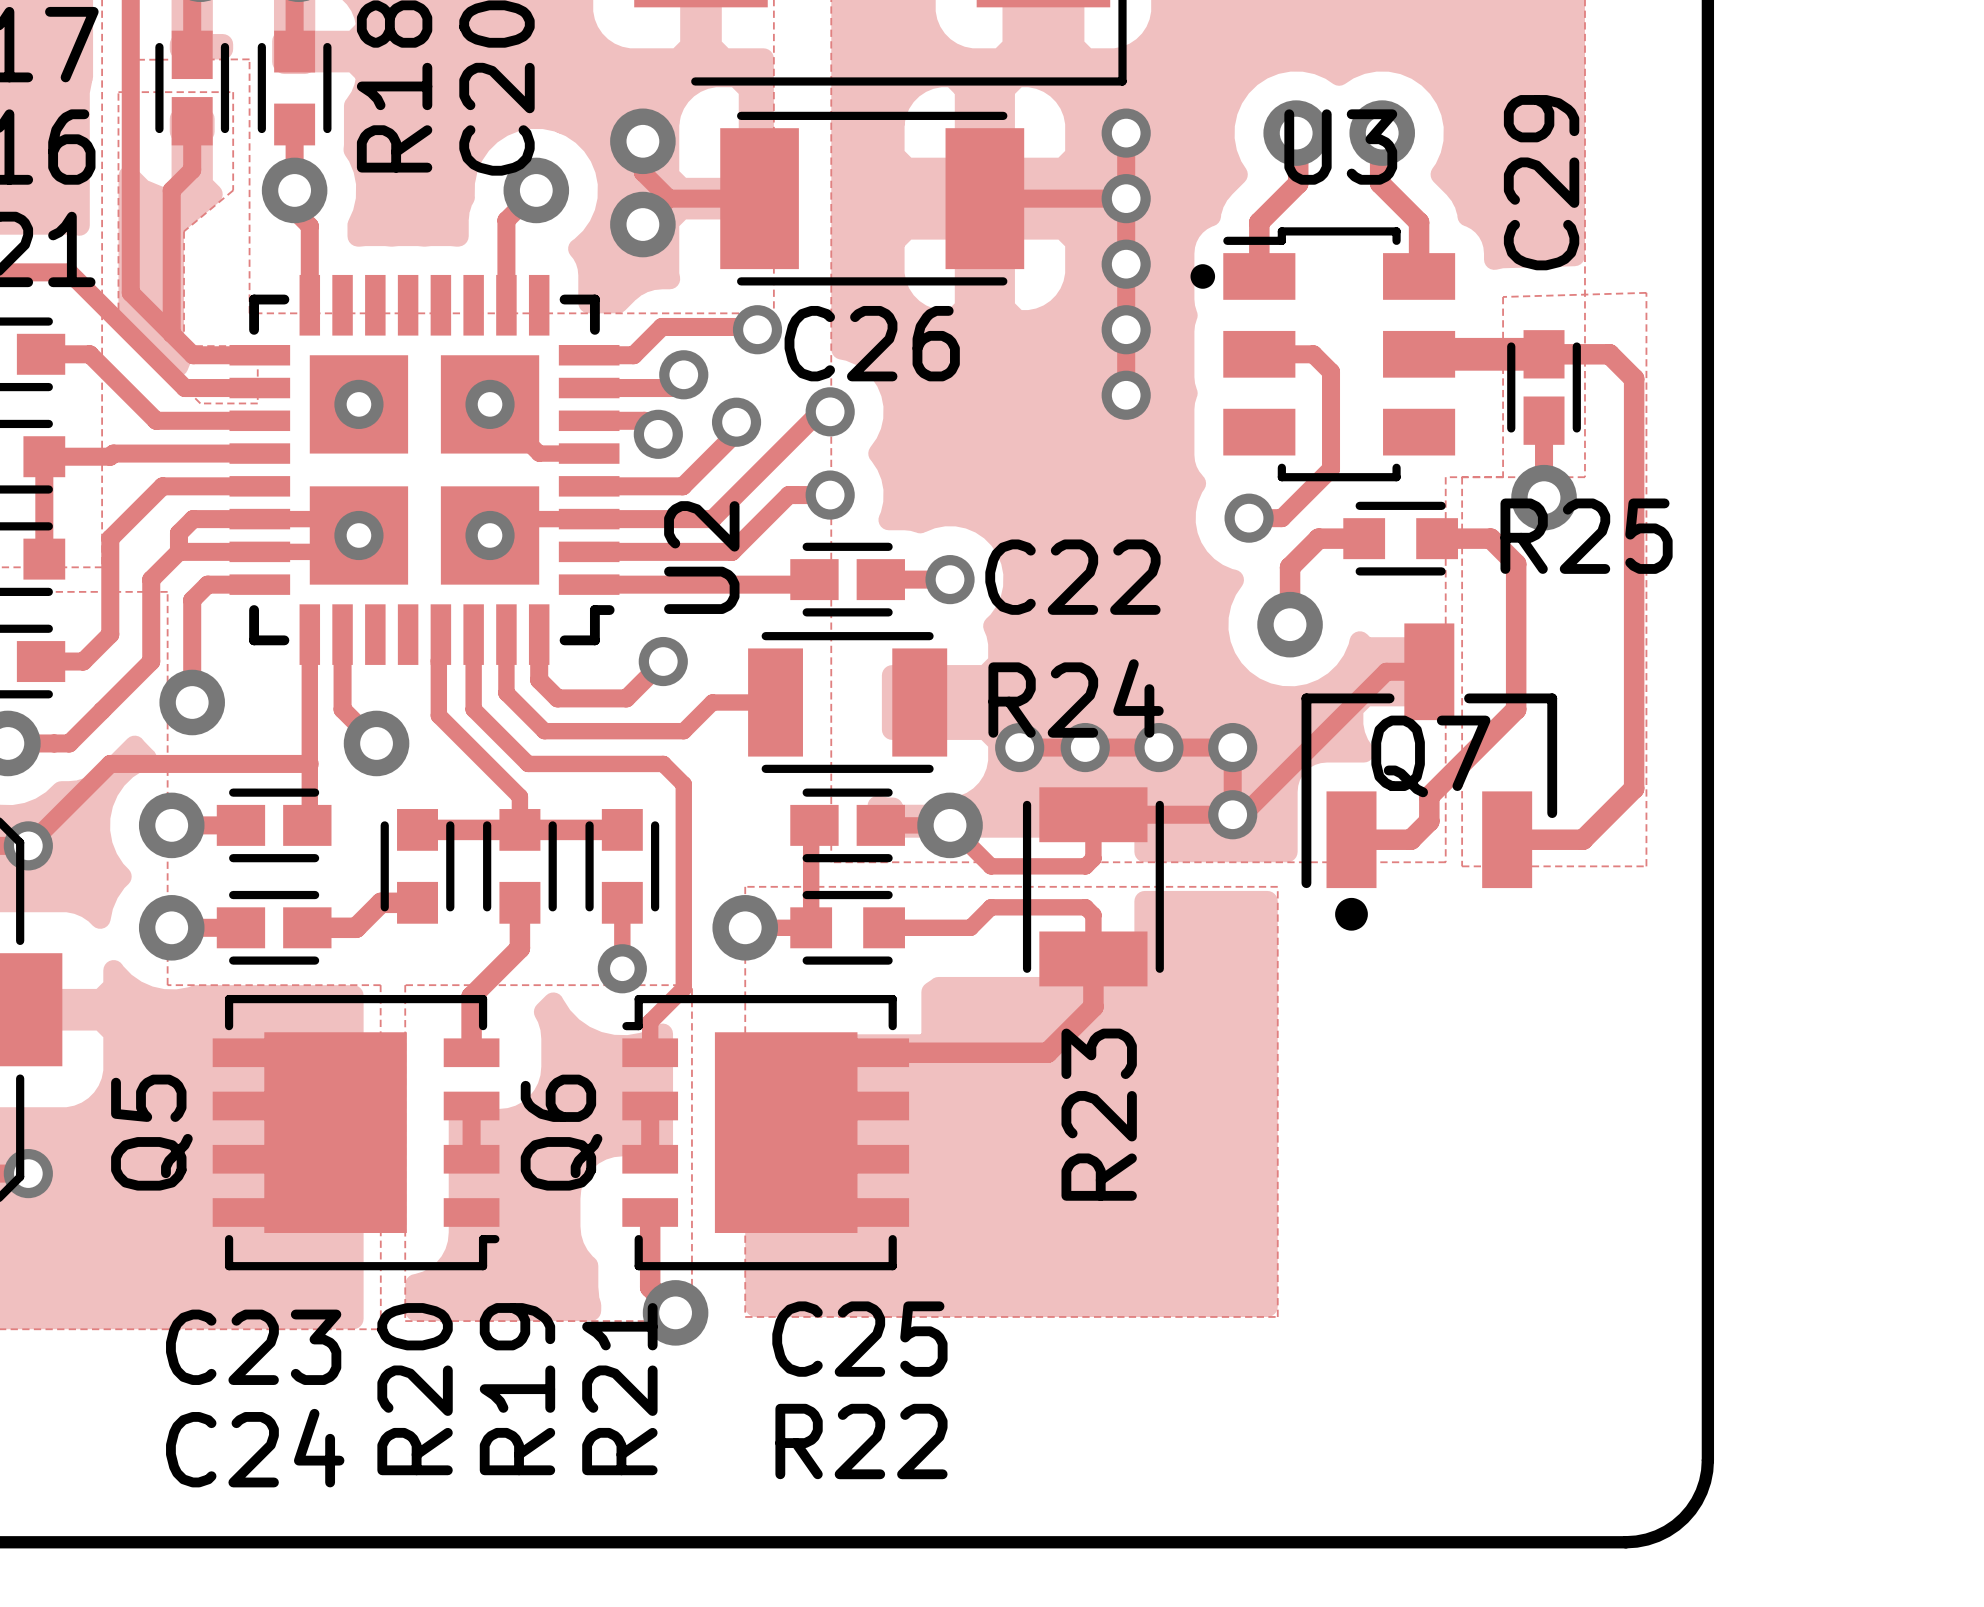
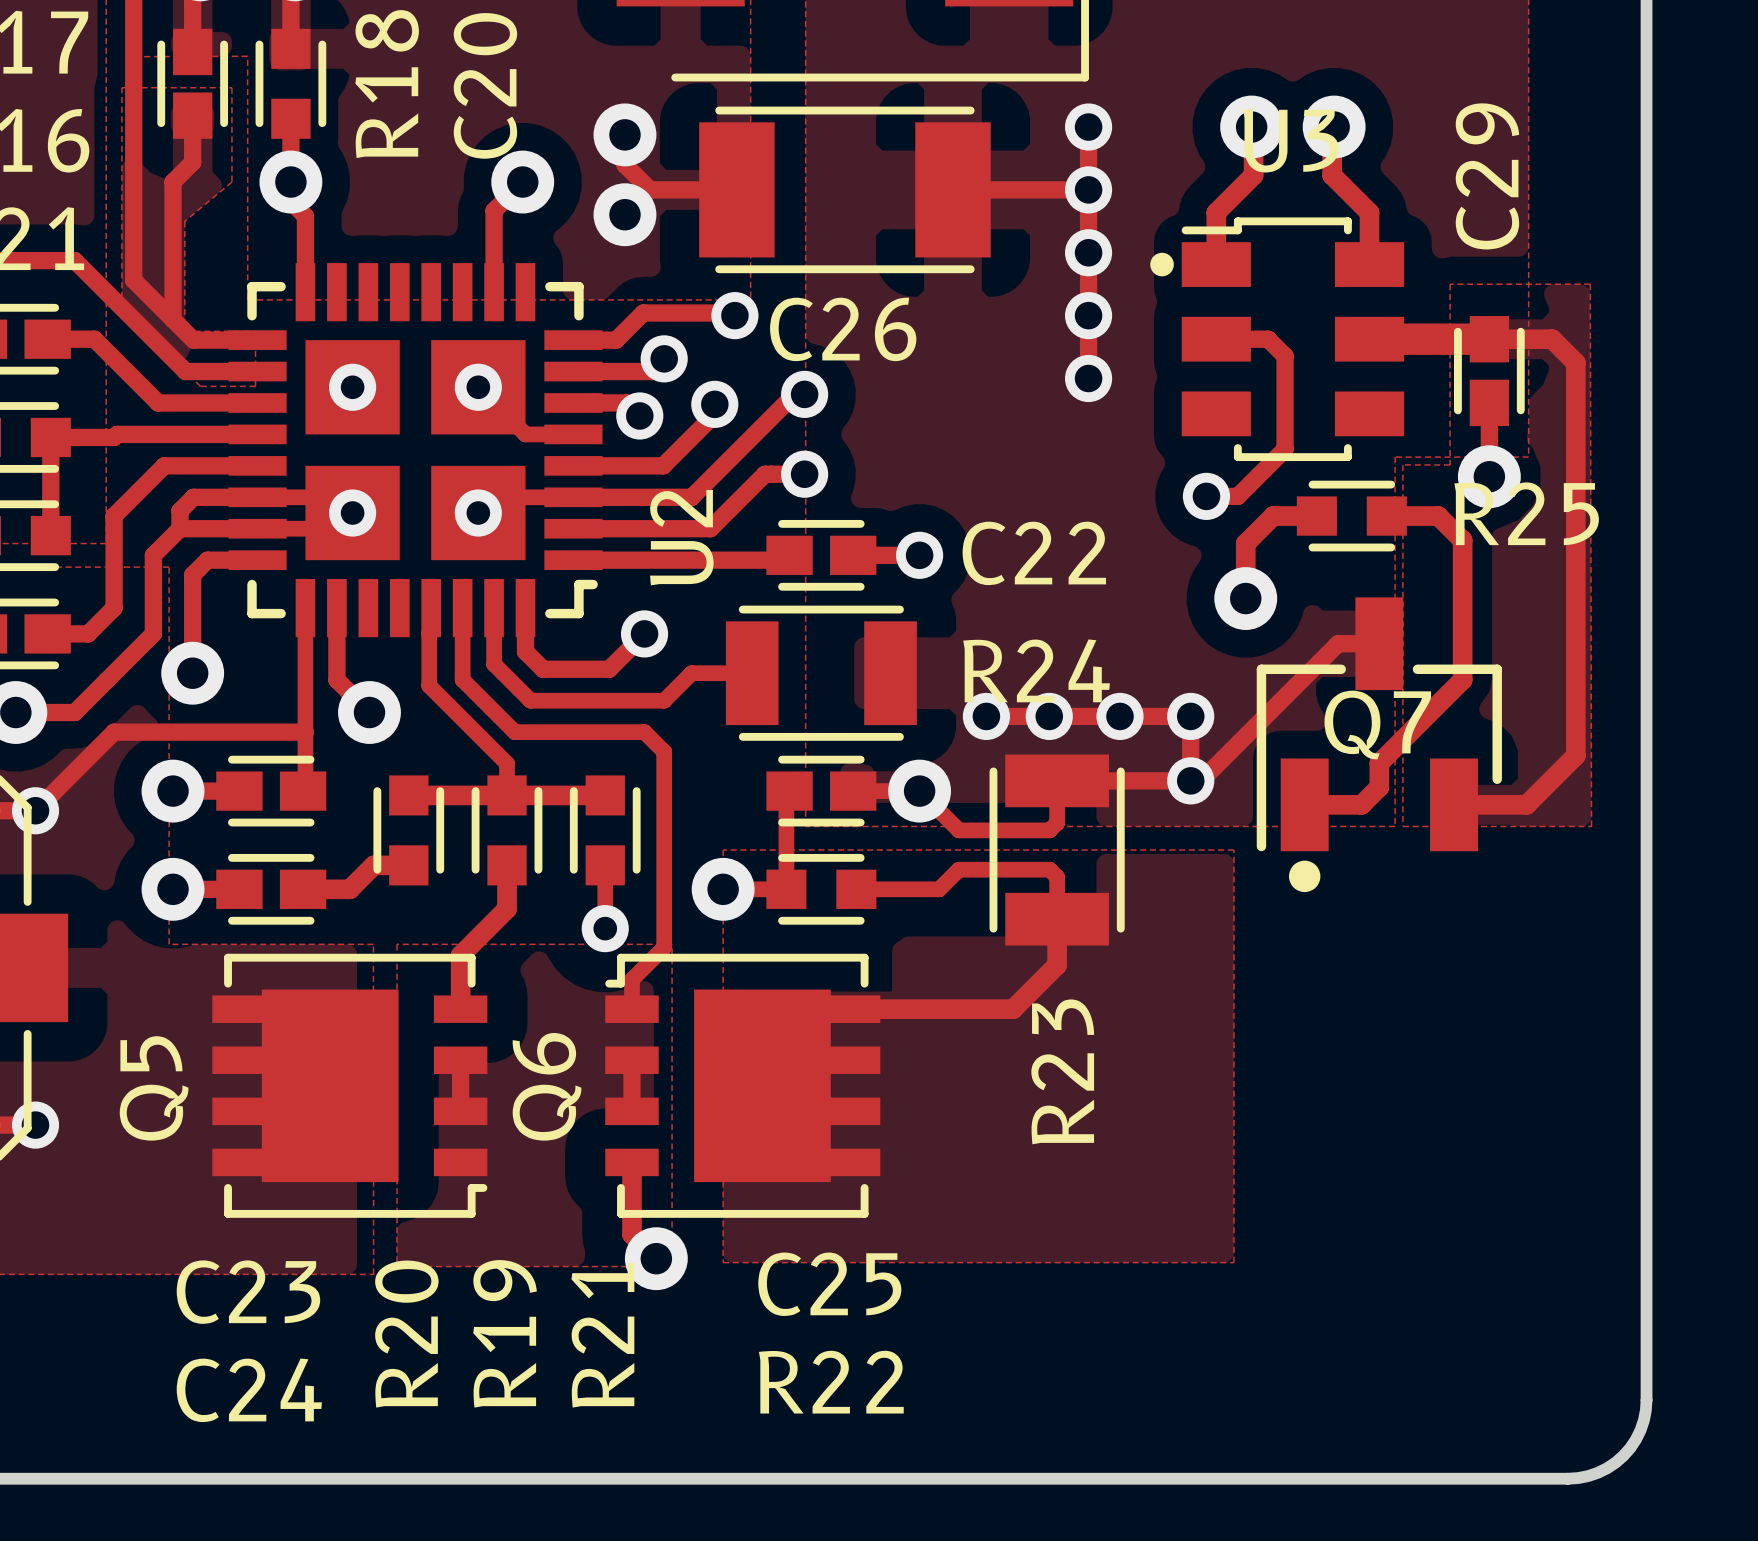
zone outline: (1503, 296) (1646, 292) (1646, 866) (1462, 866) (1462, 477) -> (1450, 284) (1590, 284) (1591, 826) (1402, 826) (1402, 464) (1450, 464) (1450, 457)

